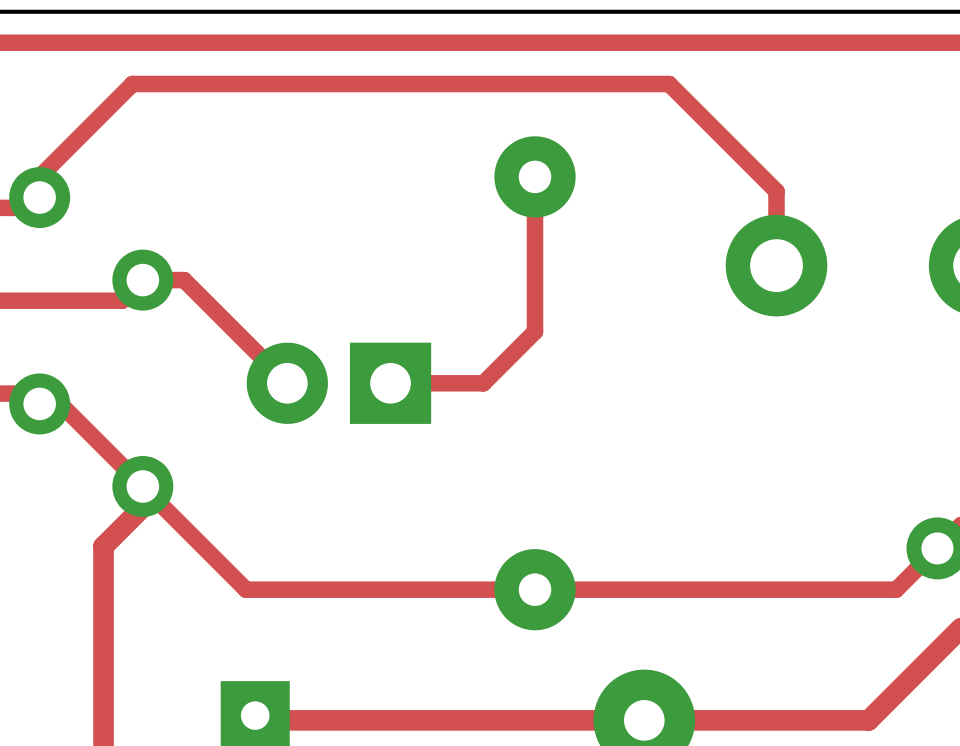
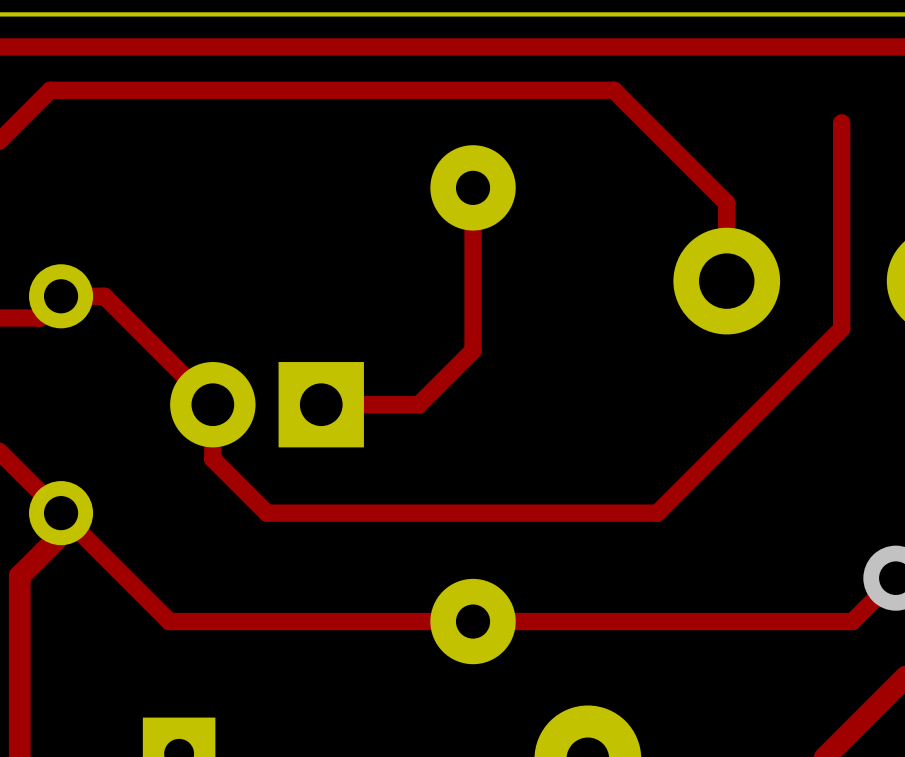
track: none -> (841, 122) (841, 328) (657, 513) (267, 513) (212, 458) (212, 404)

